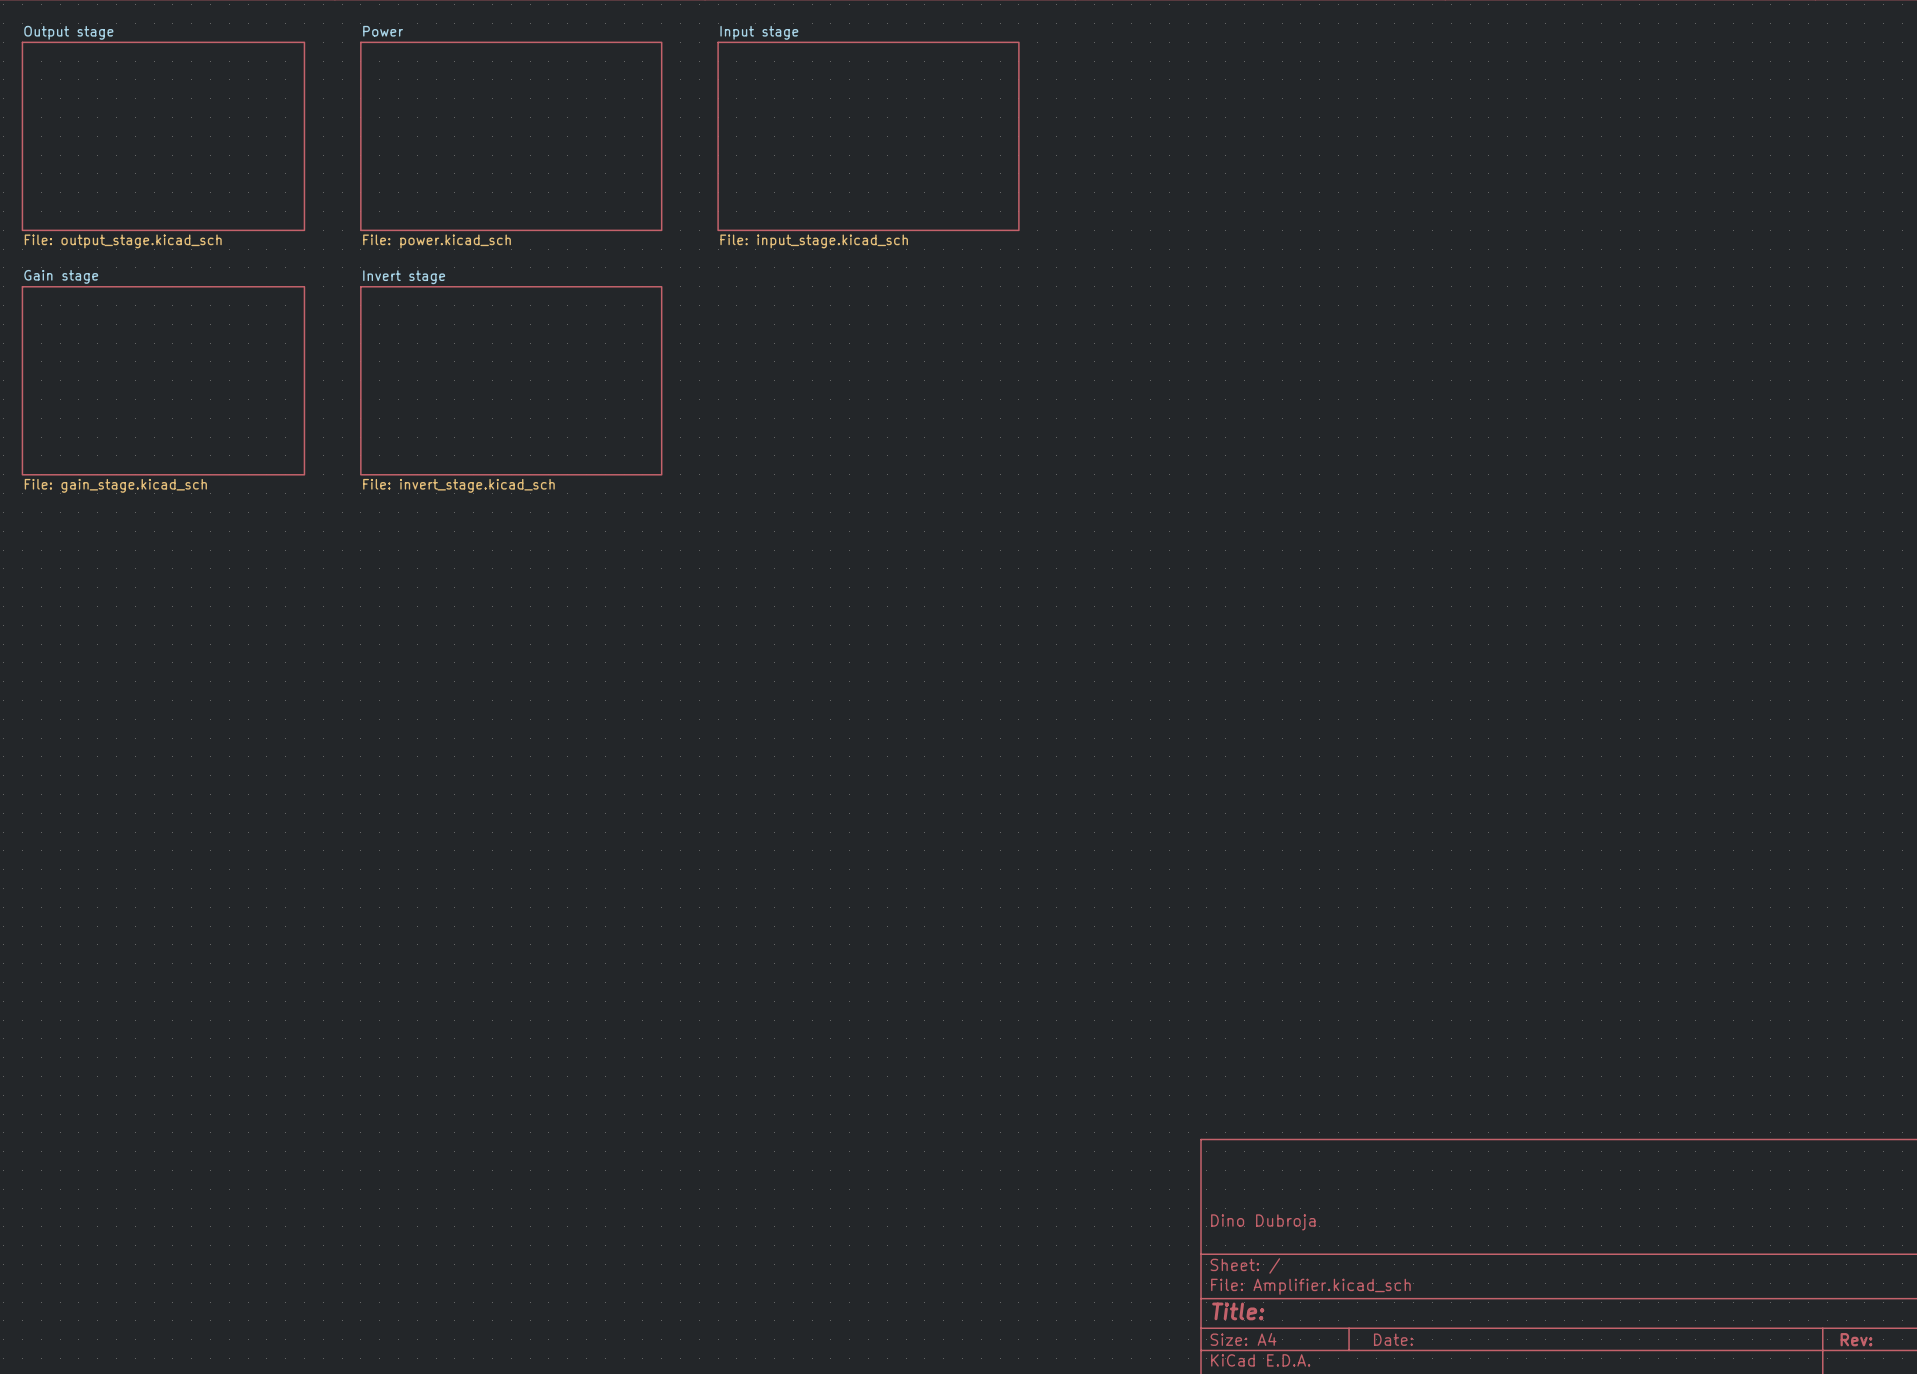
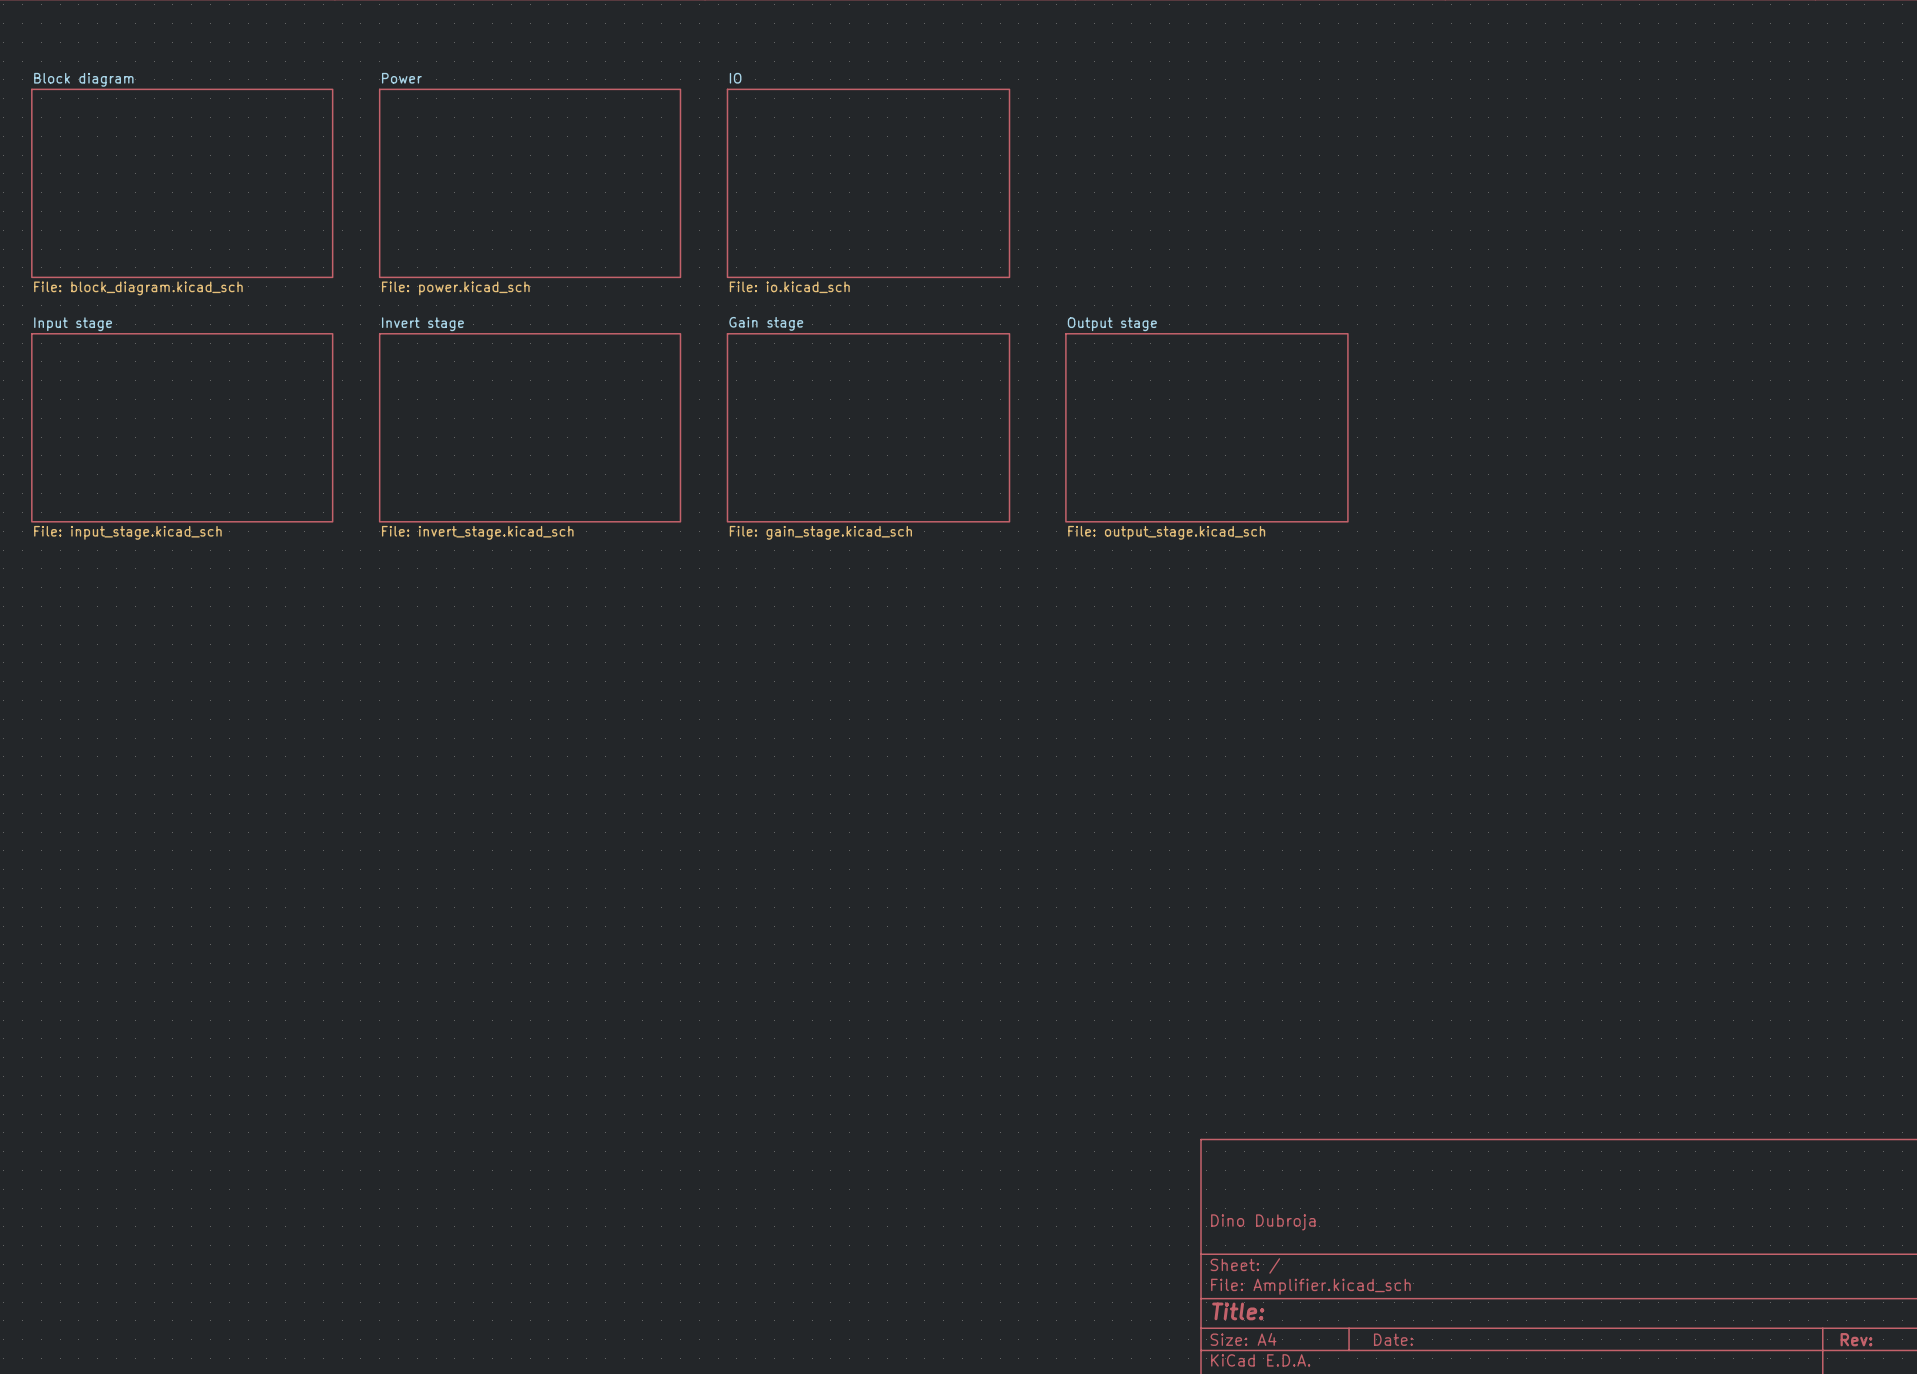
sheet Output stage: File: output_stage.kicad_sch (163, 136) -> none
sheet Power position: (511, 136) -> (530, 183)
sheet Input stage: File: input_stage.kicad_sch (868, 136) -> none
sheet Block diagram: none -> File: block_diagram.kicad_sch (182, 183)
sheet IO: none -> File: io.kicad_sch (868, 183)
sheet Gain stage: File: gain_stage.kicad_sch (163, 380) -> none
sheet Invert stage position: (511, 380) -> (530, 427)
sheet Input stage: none -> File: input_stage.kicad_sch (182, 427)
sheet Gain stage: none -> File: gain_stage.kicad_sch (868, 427)
sheet Output stage: none -> File: output_stage.kicad_sch (1206, 427)

